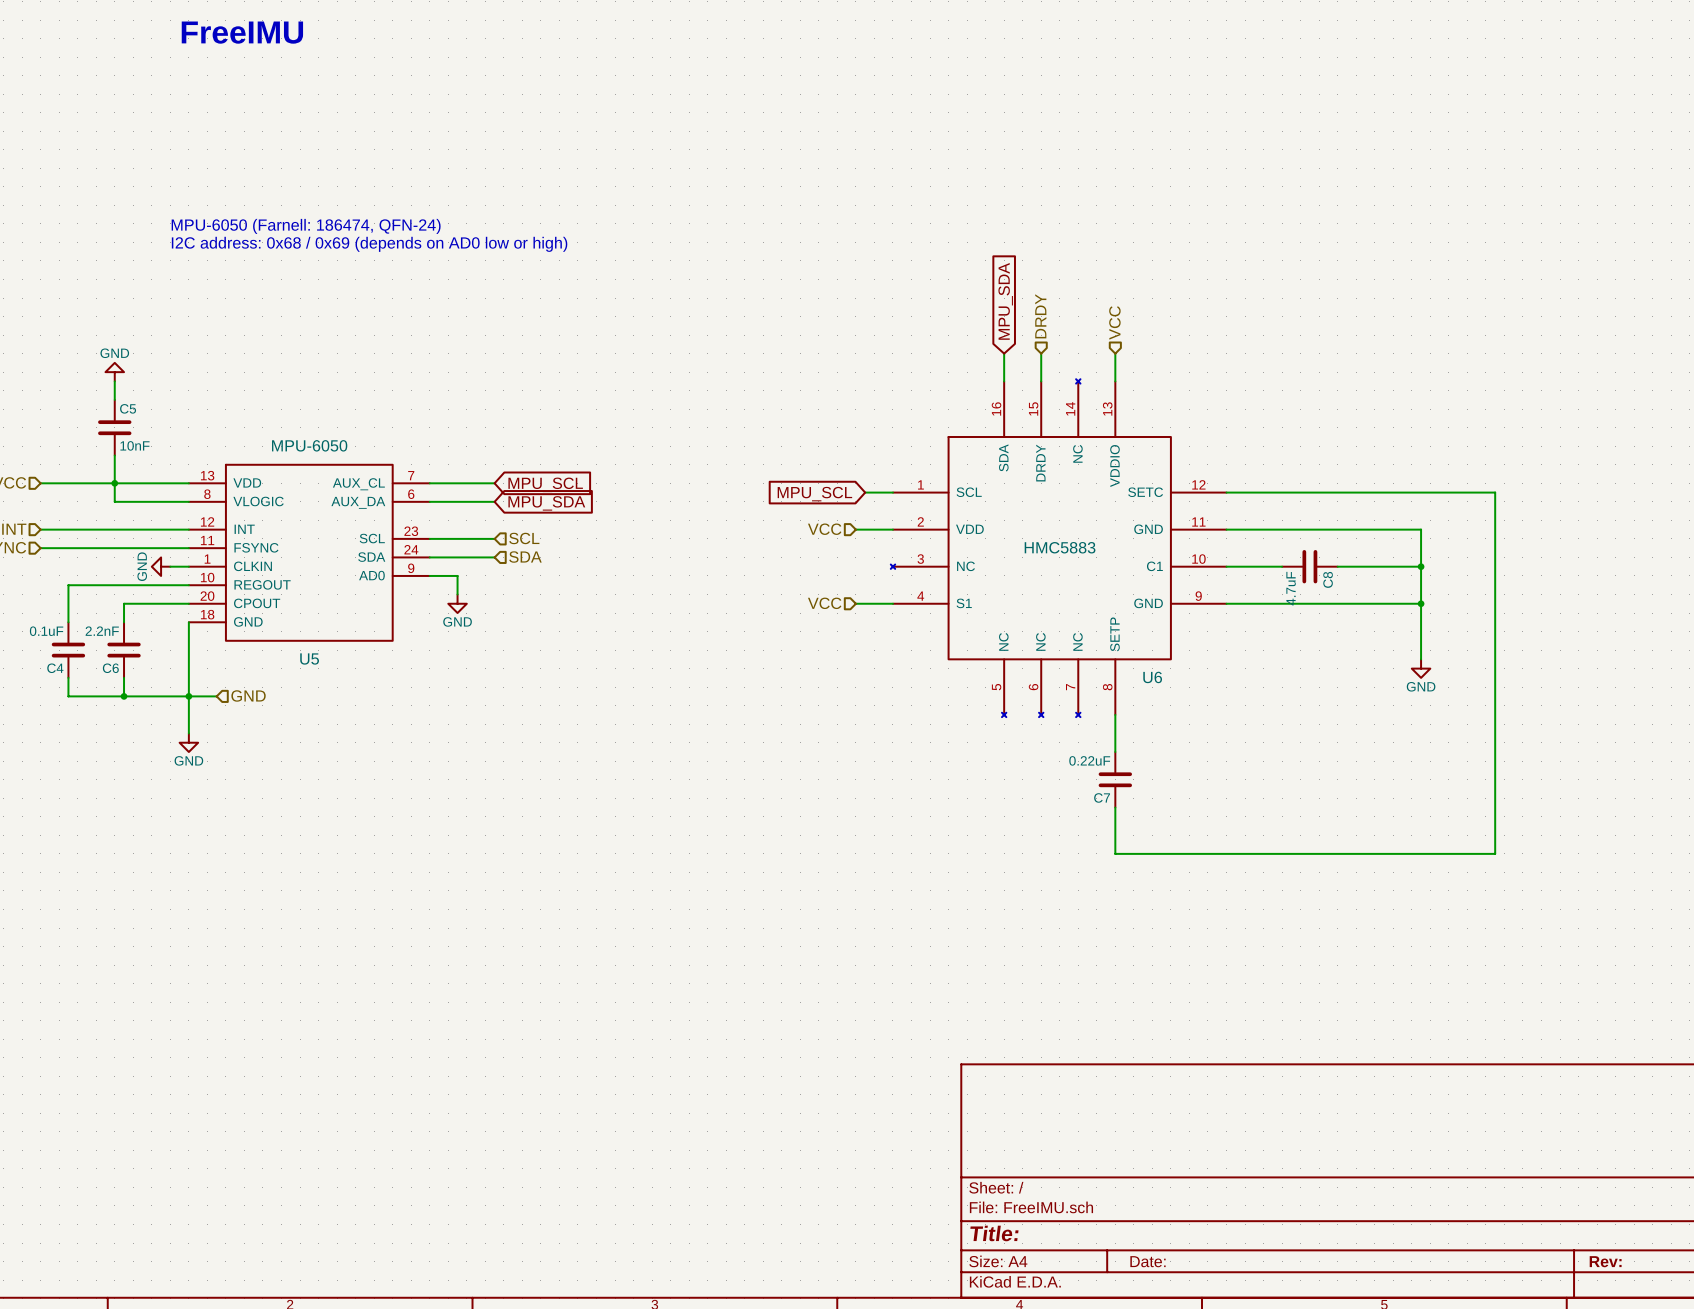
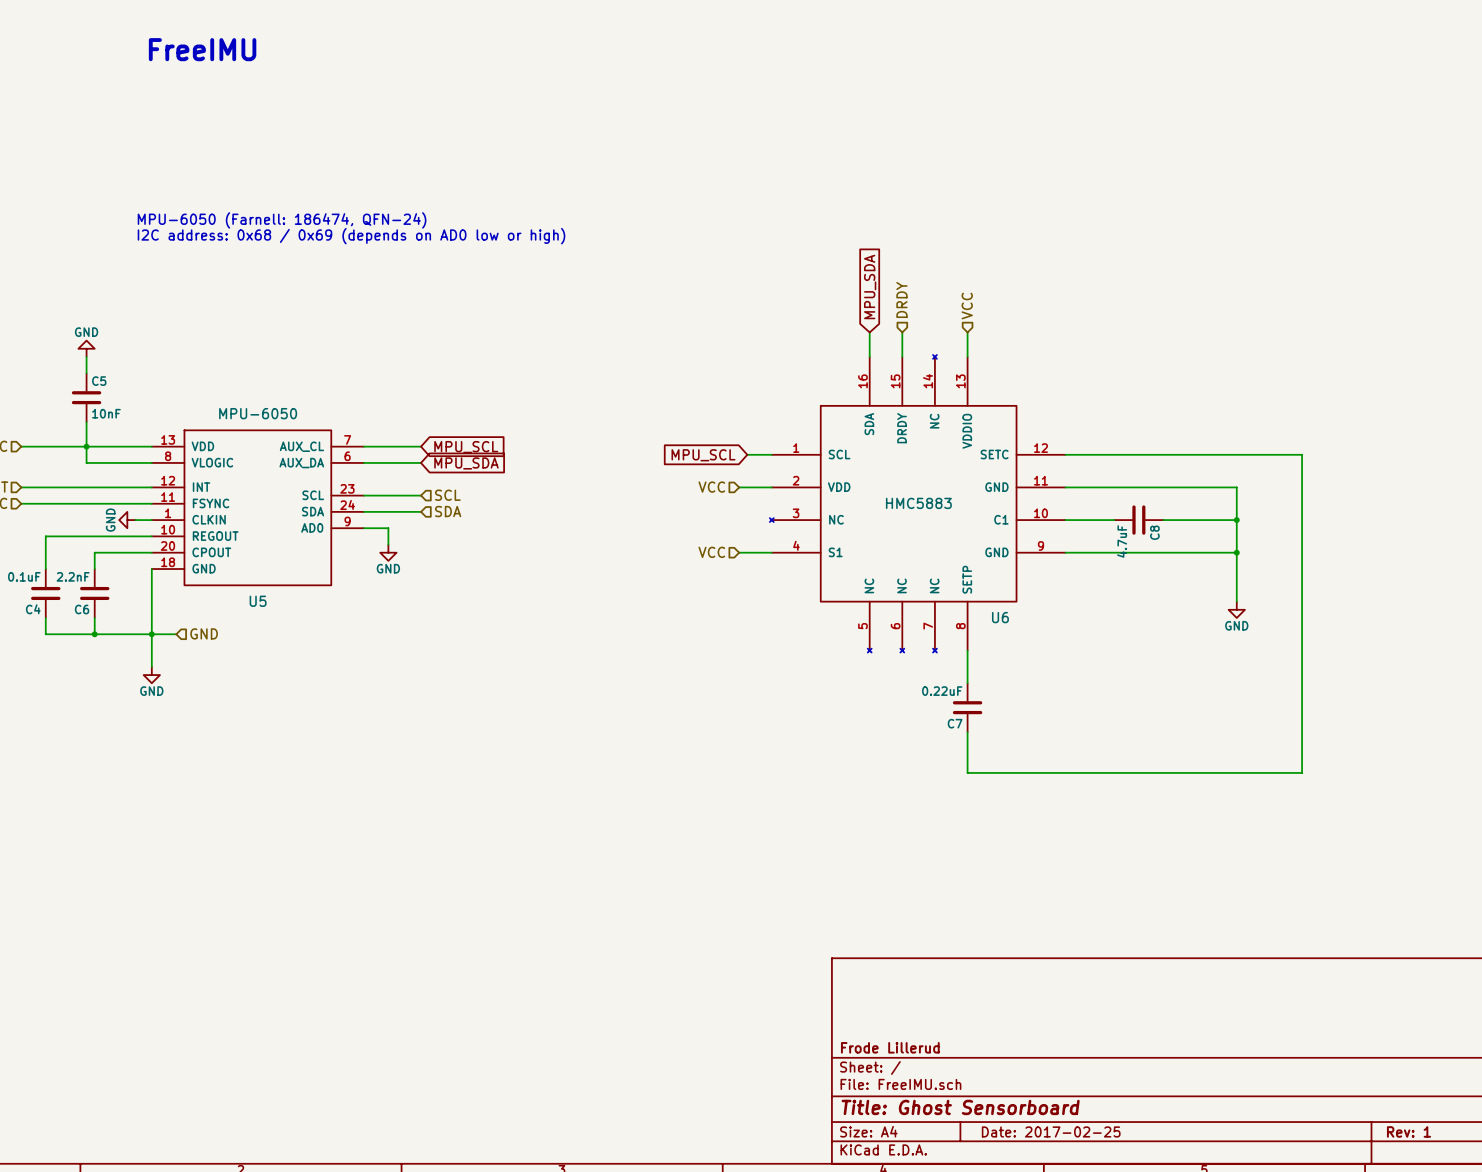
title block: none -> Frode Lillerud (890, 1047)
title block: Title: (994, 1233) -> Title: Ghost Sensorboard (960, 1107)
title block: Date: (1148, 1261) -> Date: 2017-02-25 (1051, 1131)
title block: Rev: (1605, 1261) -> Rev: 1 (1409, 1131)

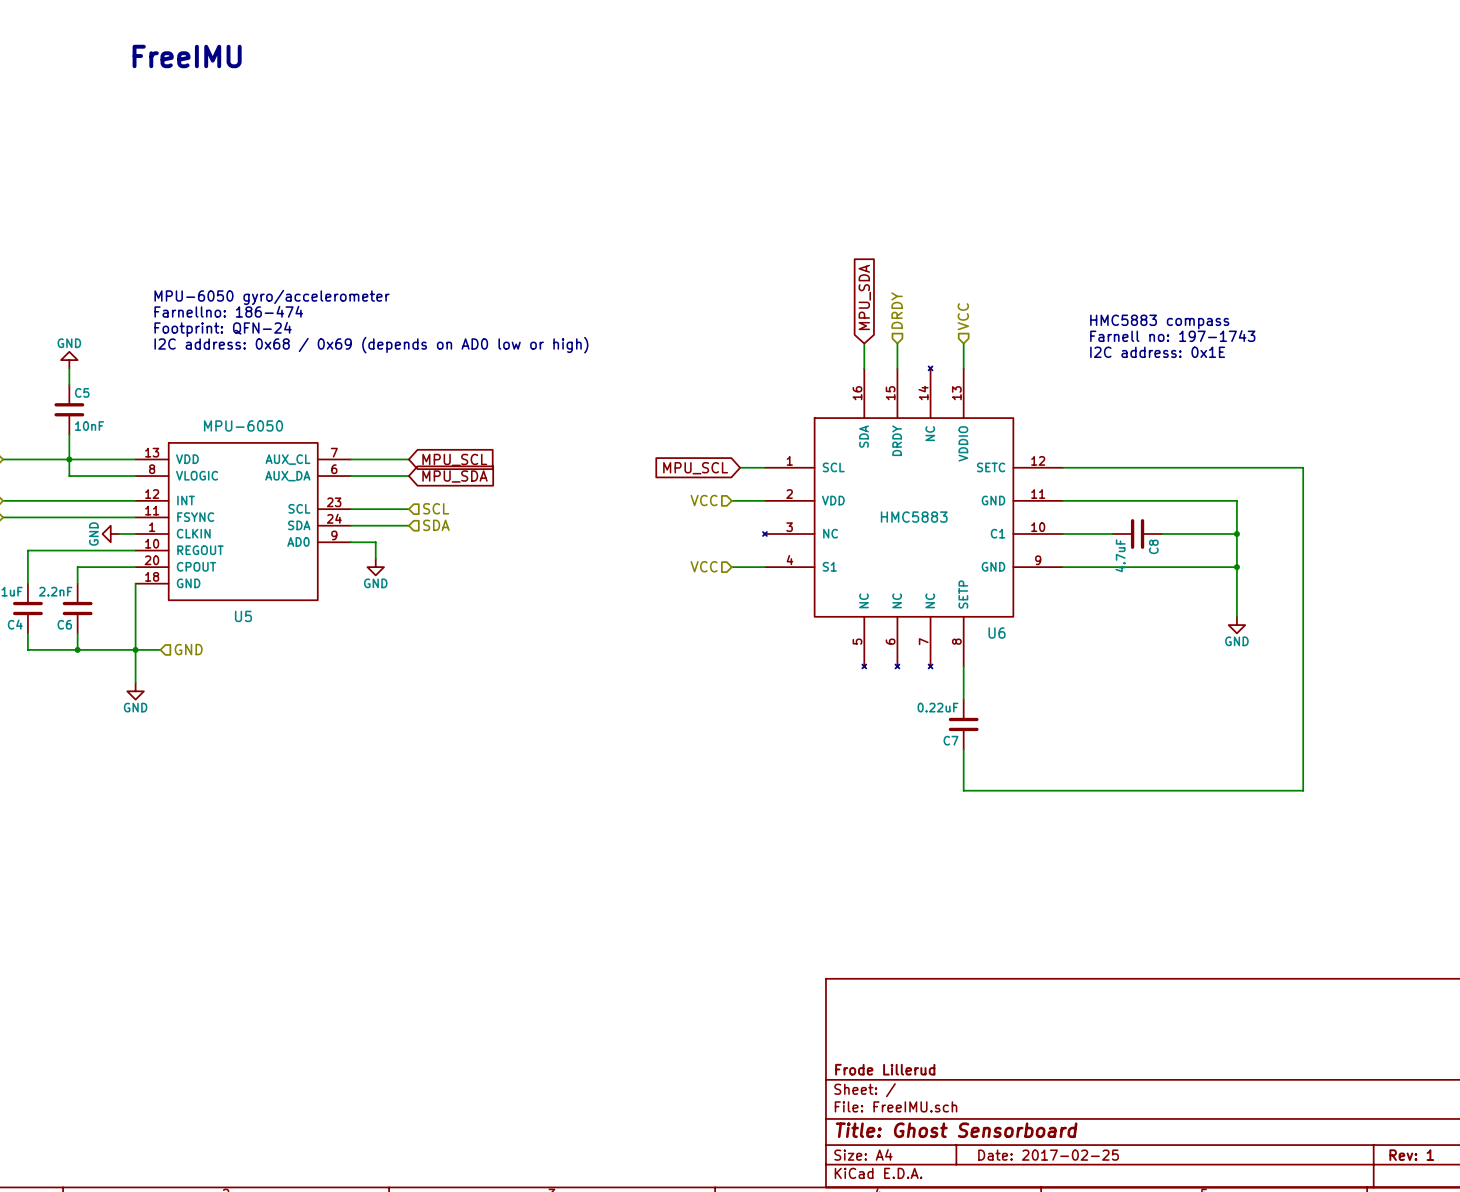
text: MPU-6050 (Farnell: 186474, QFN-24) (282, 220) -> none
text position: I2C address: 0x68 / 0x69 (depends on AD0 low or high) (351, 236) -> I2C address: 0x68 / 0x69 (depends on AD0 low or high) (371, 345)
text: none -> MPU-6050 gyro/accelerometer (272, 297)
text: none -> Farnellno: 186-474 (228, 311)
text: none -> HMC5883 compass (1159, 321)
text: none -> Footprint: QFN-24 (223, 329)
text: none -> Farnell no: 197-1743 (1172, 336)
text: none -> I2C address: 0x1E (1157, 352)

